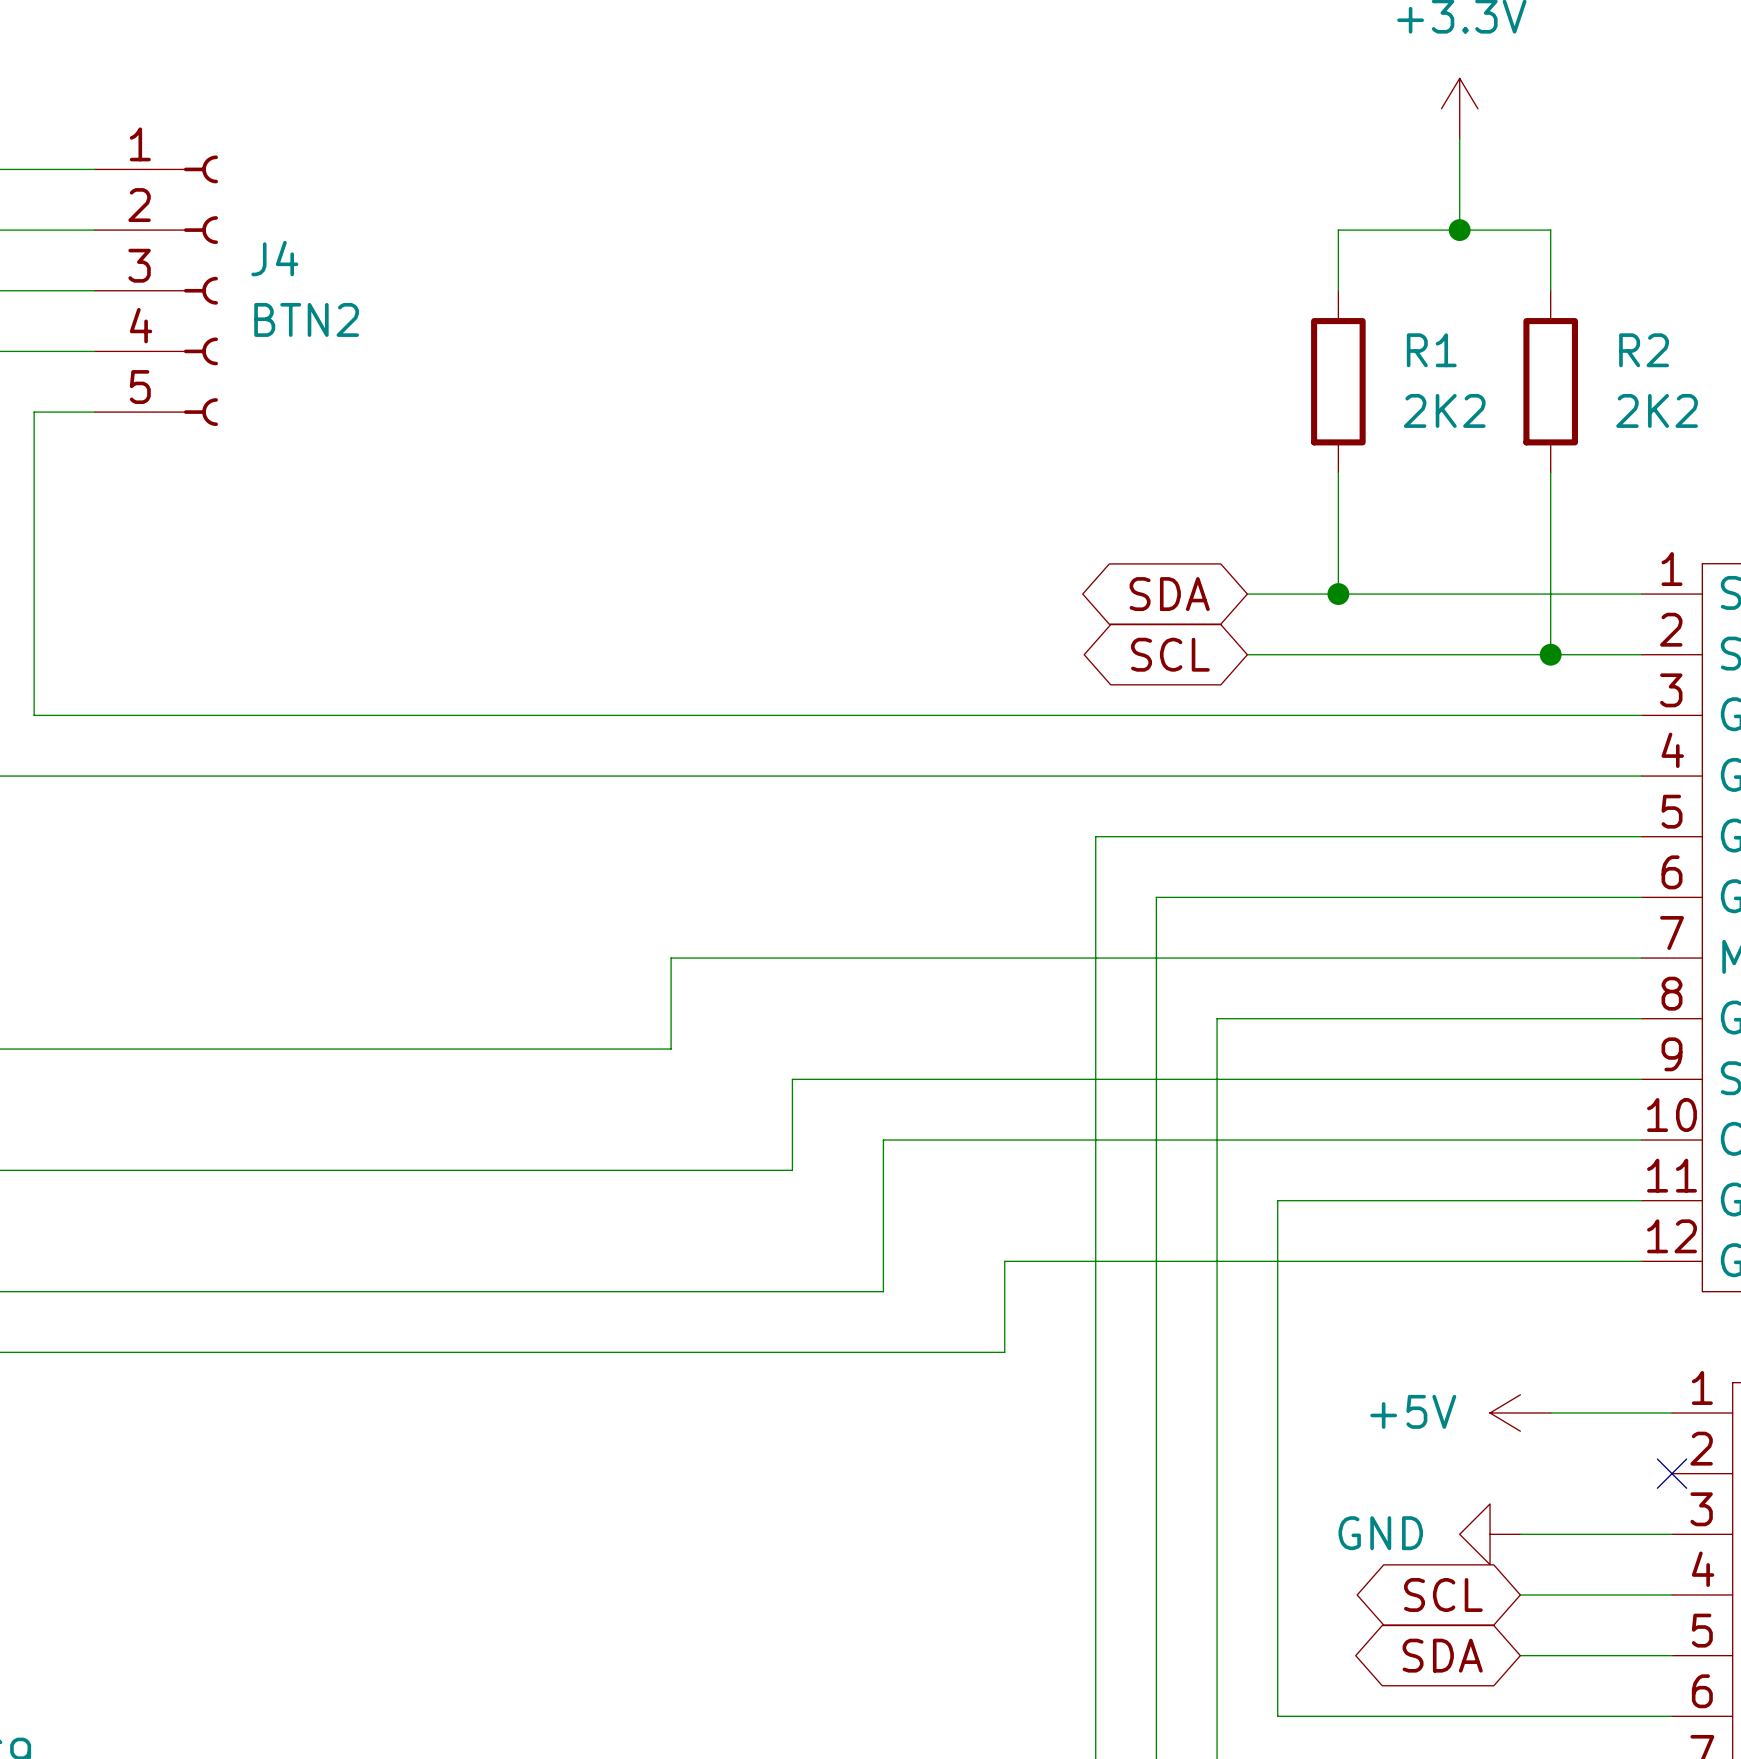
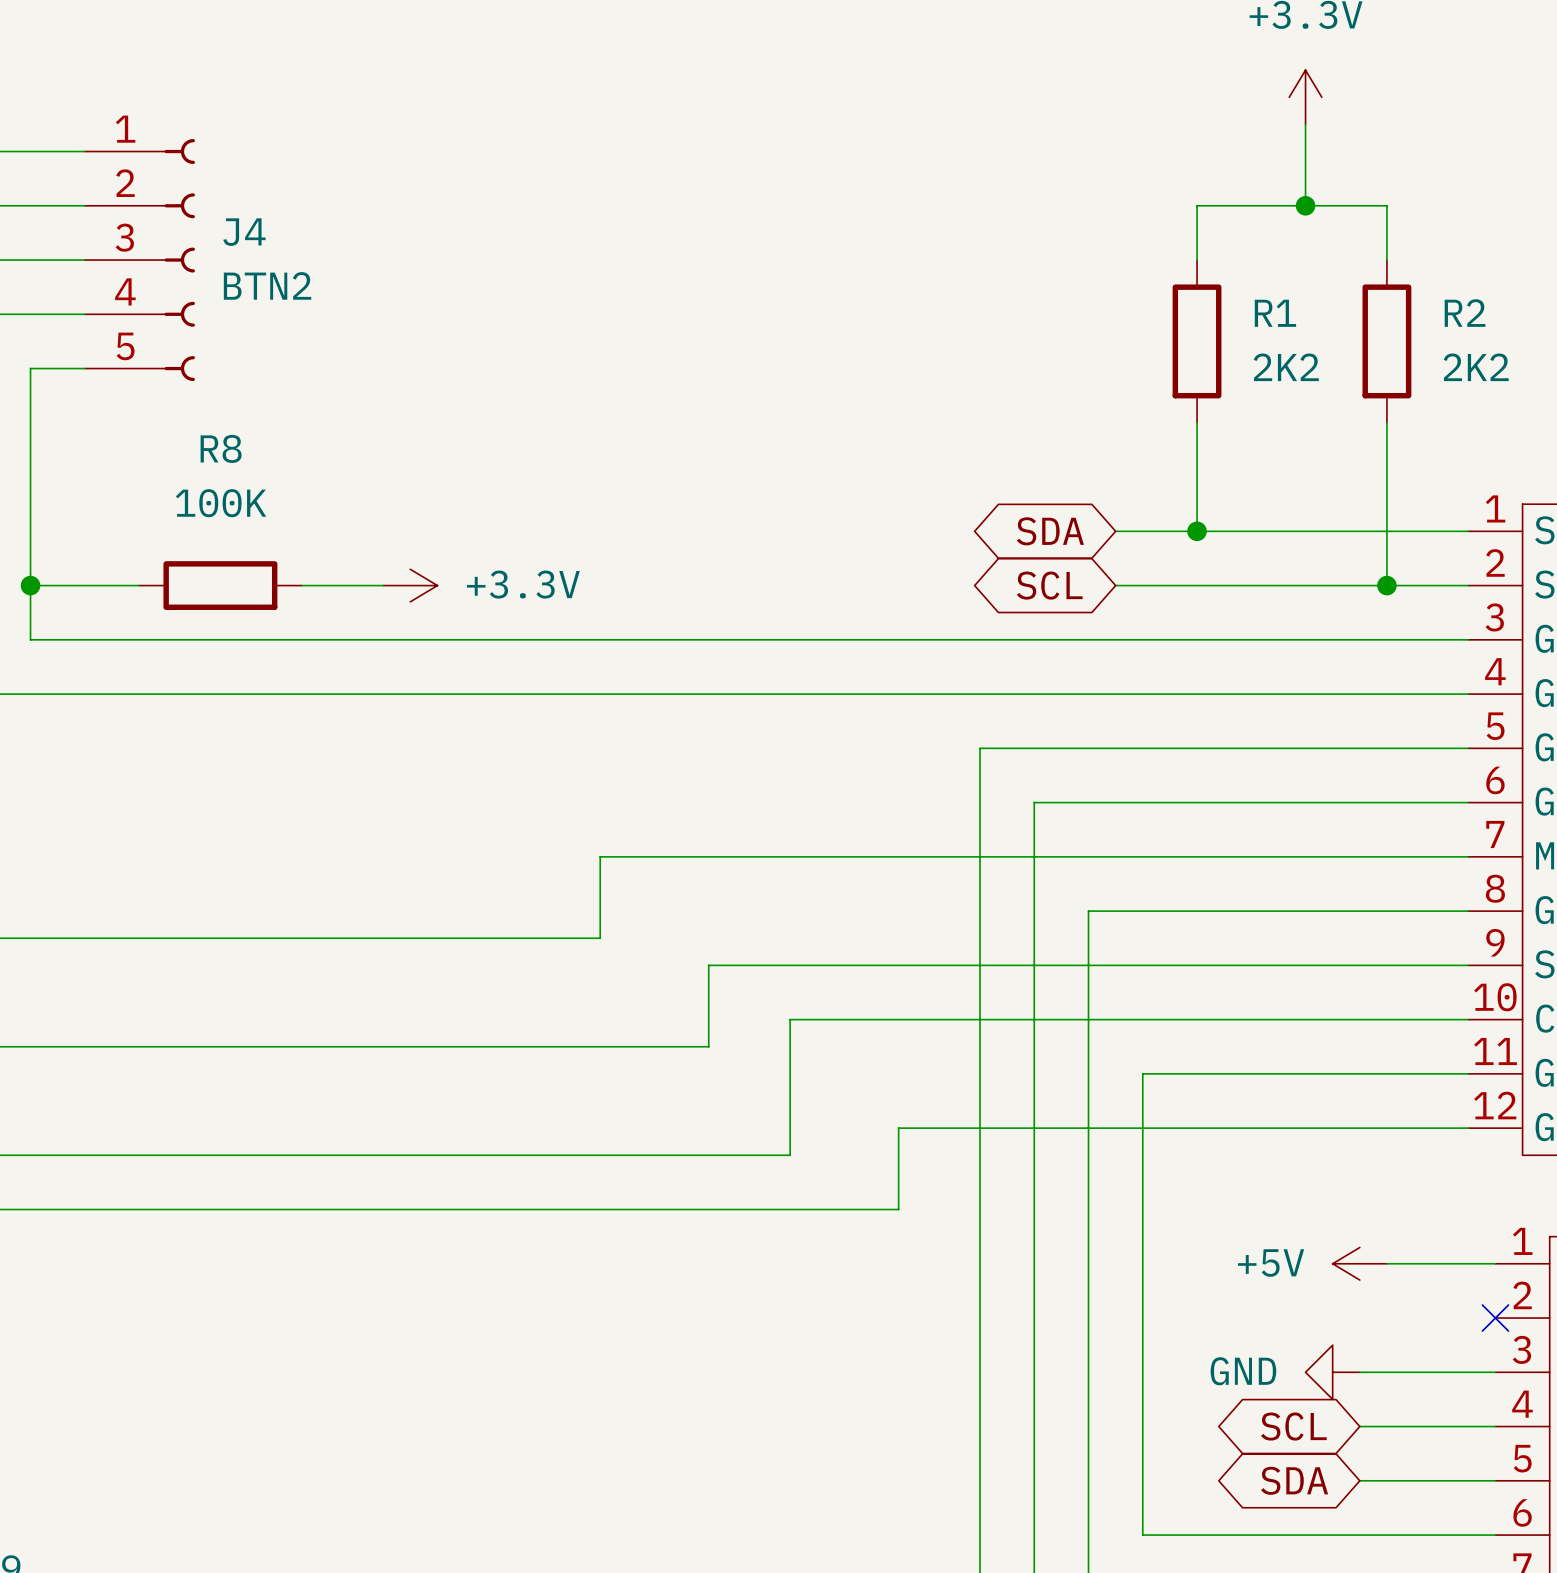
wire: none -> (30, 585) (139, 585)
junction: none -> (30, 585)
R8: none -> 100K (220, 585)
wire: none -> (301, 585) (383, 585)
power symbol: none -> +3.3V (410, 585)

